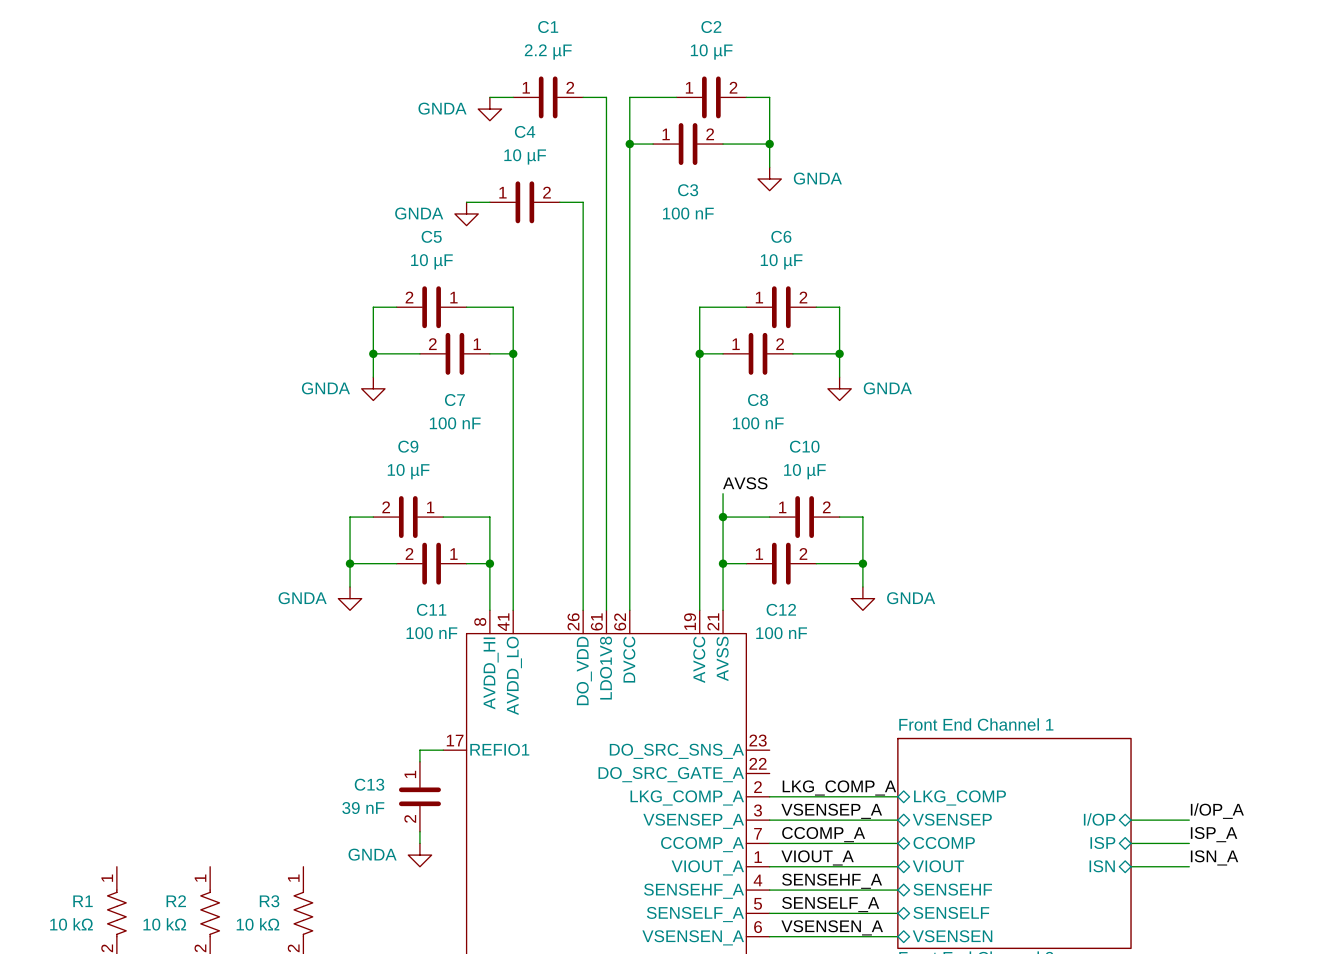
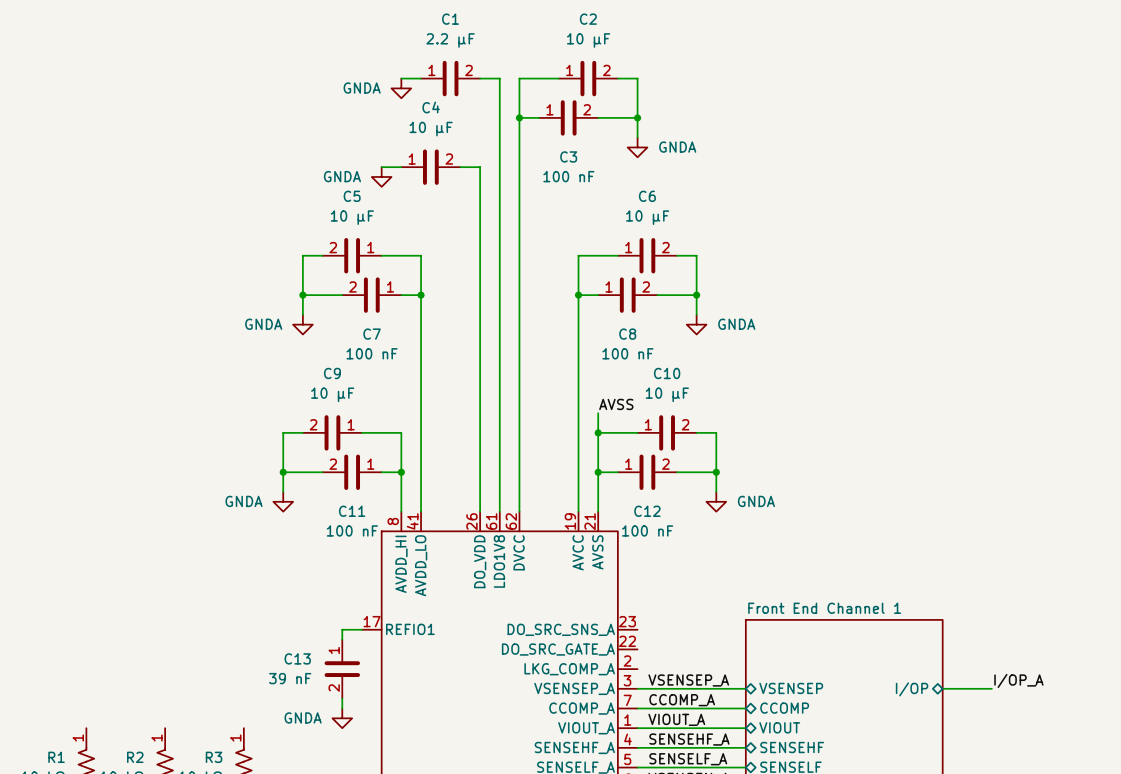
label: LKG_COMP_A (839, 788) -> none
wire: (769, 796) (897, 796) -> none
sheet pin: LKG_COMP (960, 797) -> none
label: ISP_A (1214, 834) -> none
sheet pin: ISP (1102, 842) -> none
wire: (1131, 843) (1189, 843) -> none
label: ISN_A (1214, 857) -> none
sheet pin: ISN (1102, 866) -> none
wire: (1131, 866) (1189, 866) -> none

